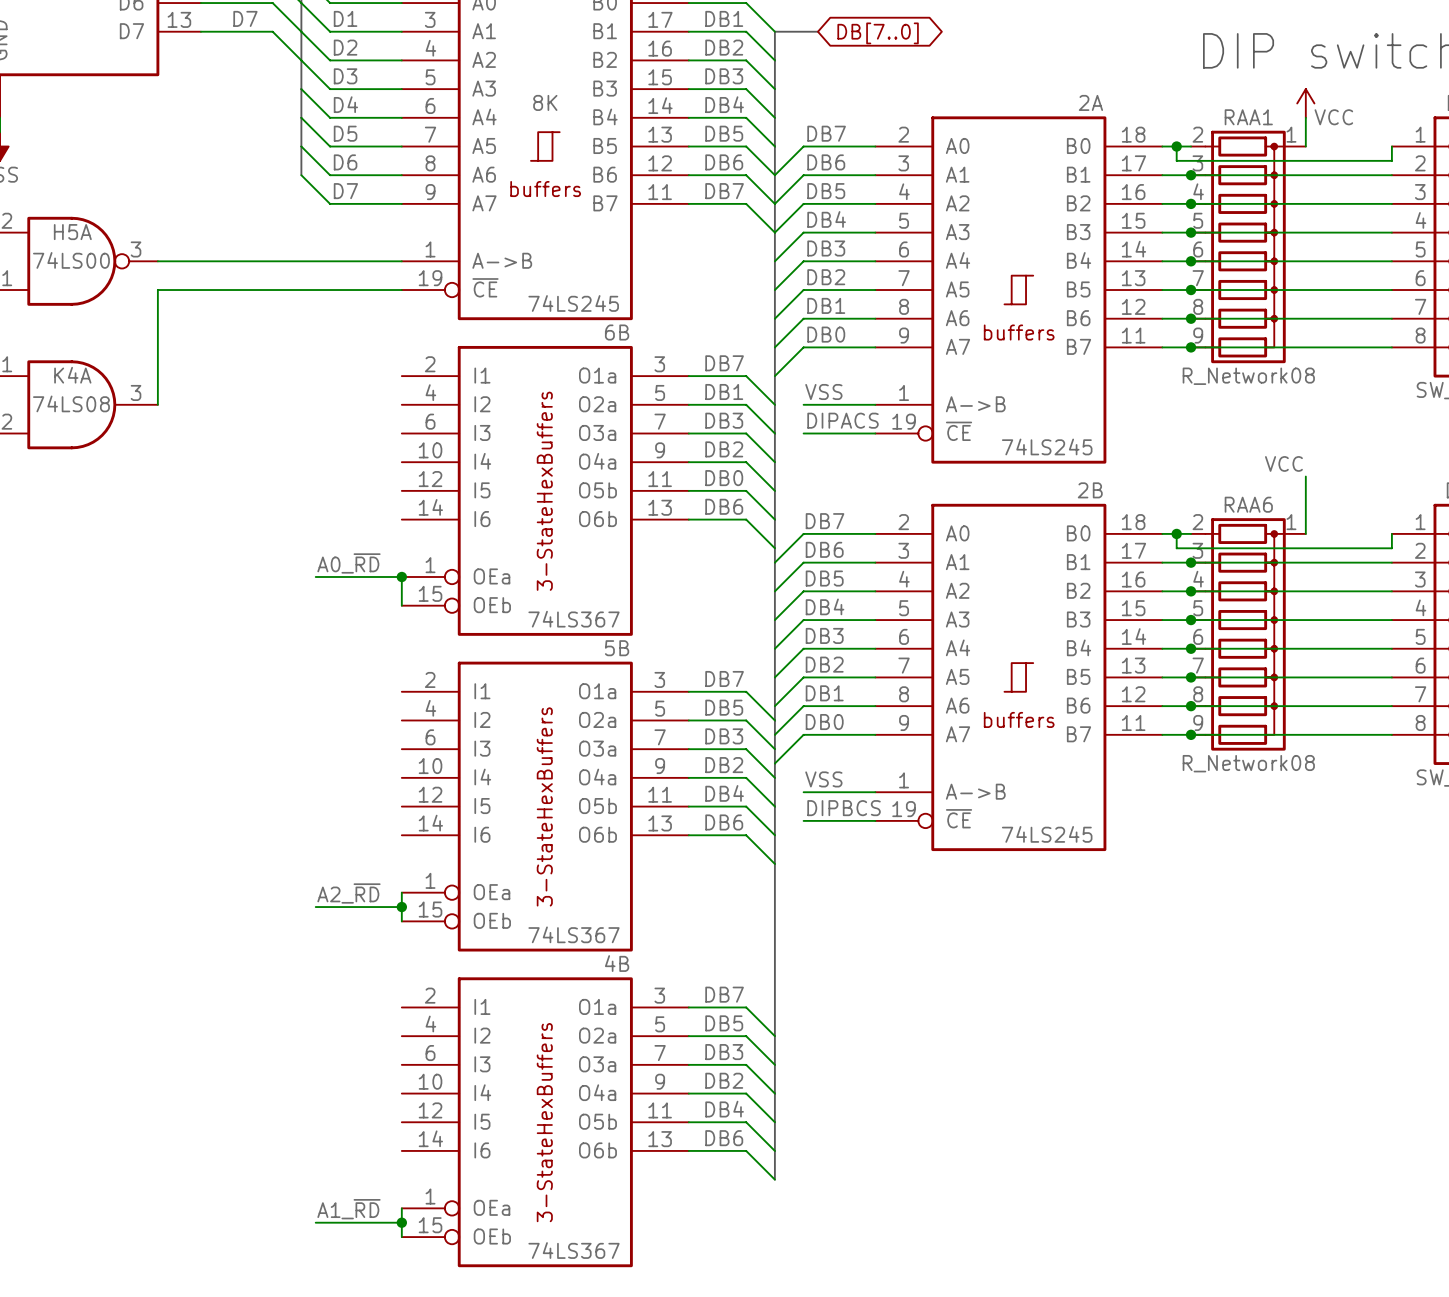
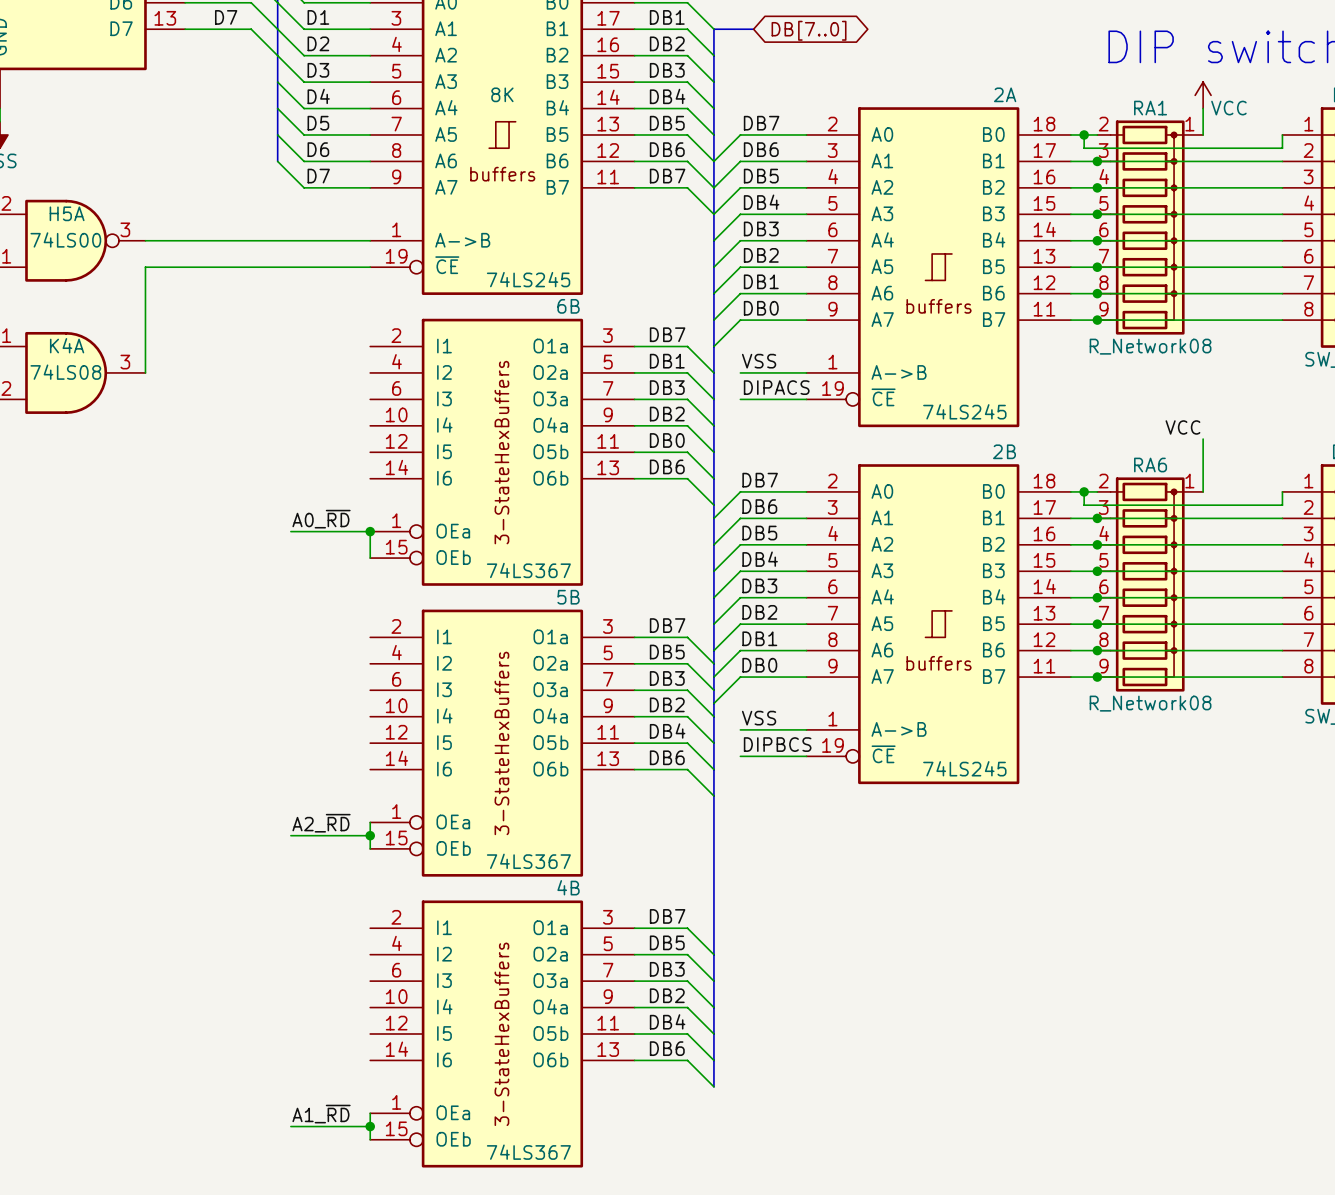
RAA1 name: RAA1 (1248, 117) -> RA1 (1150, 108)
RAA6 name: RAA6 (1248, 504) -> RA6 (1150, 465)

